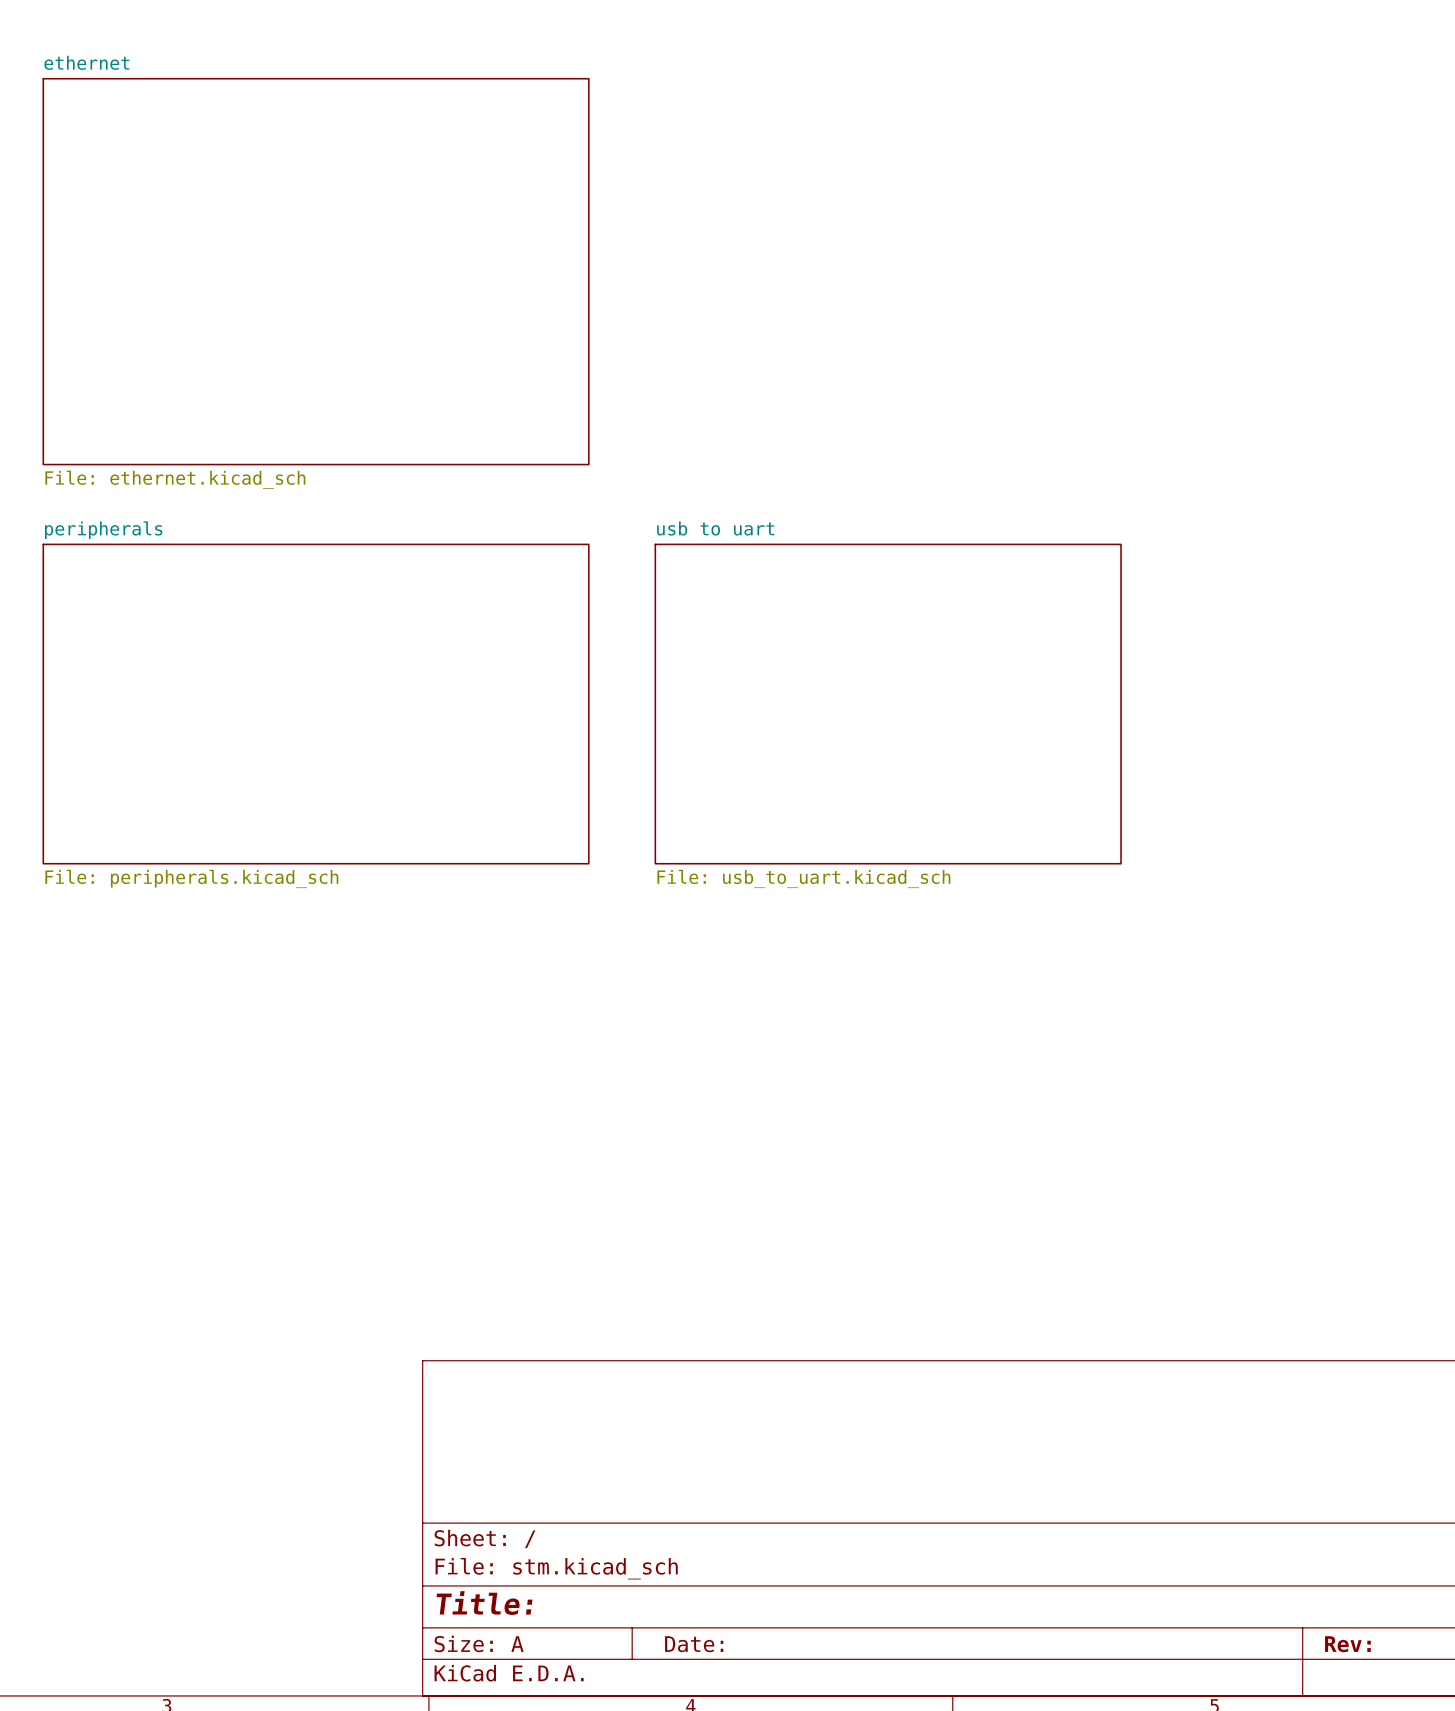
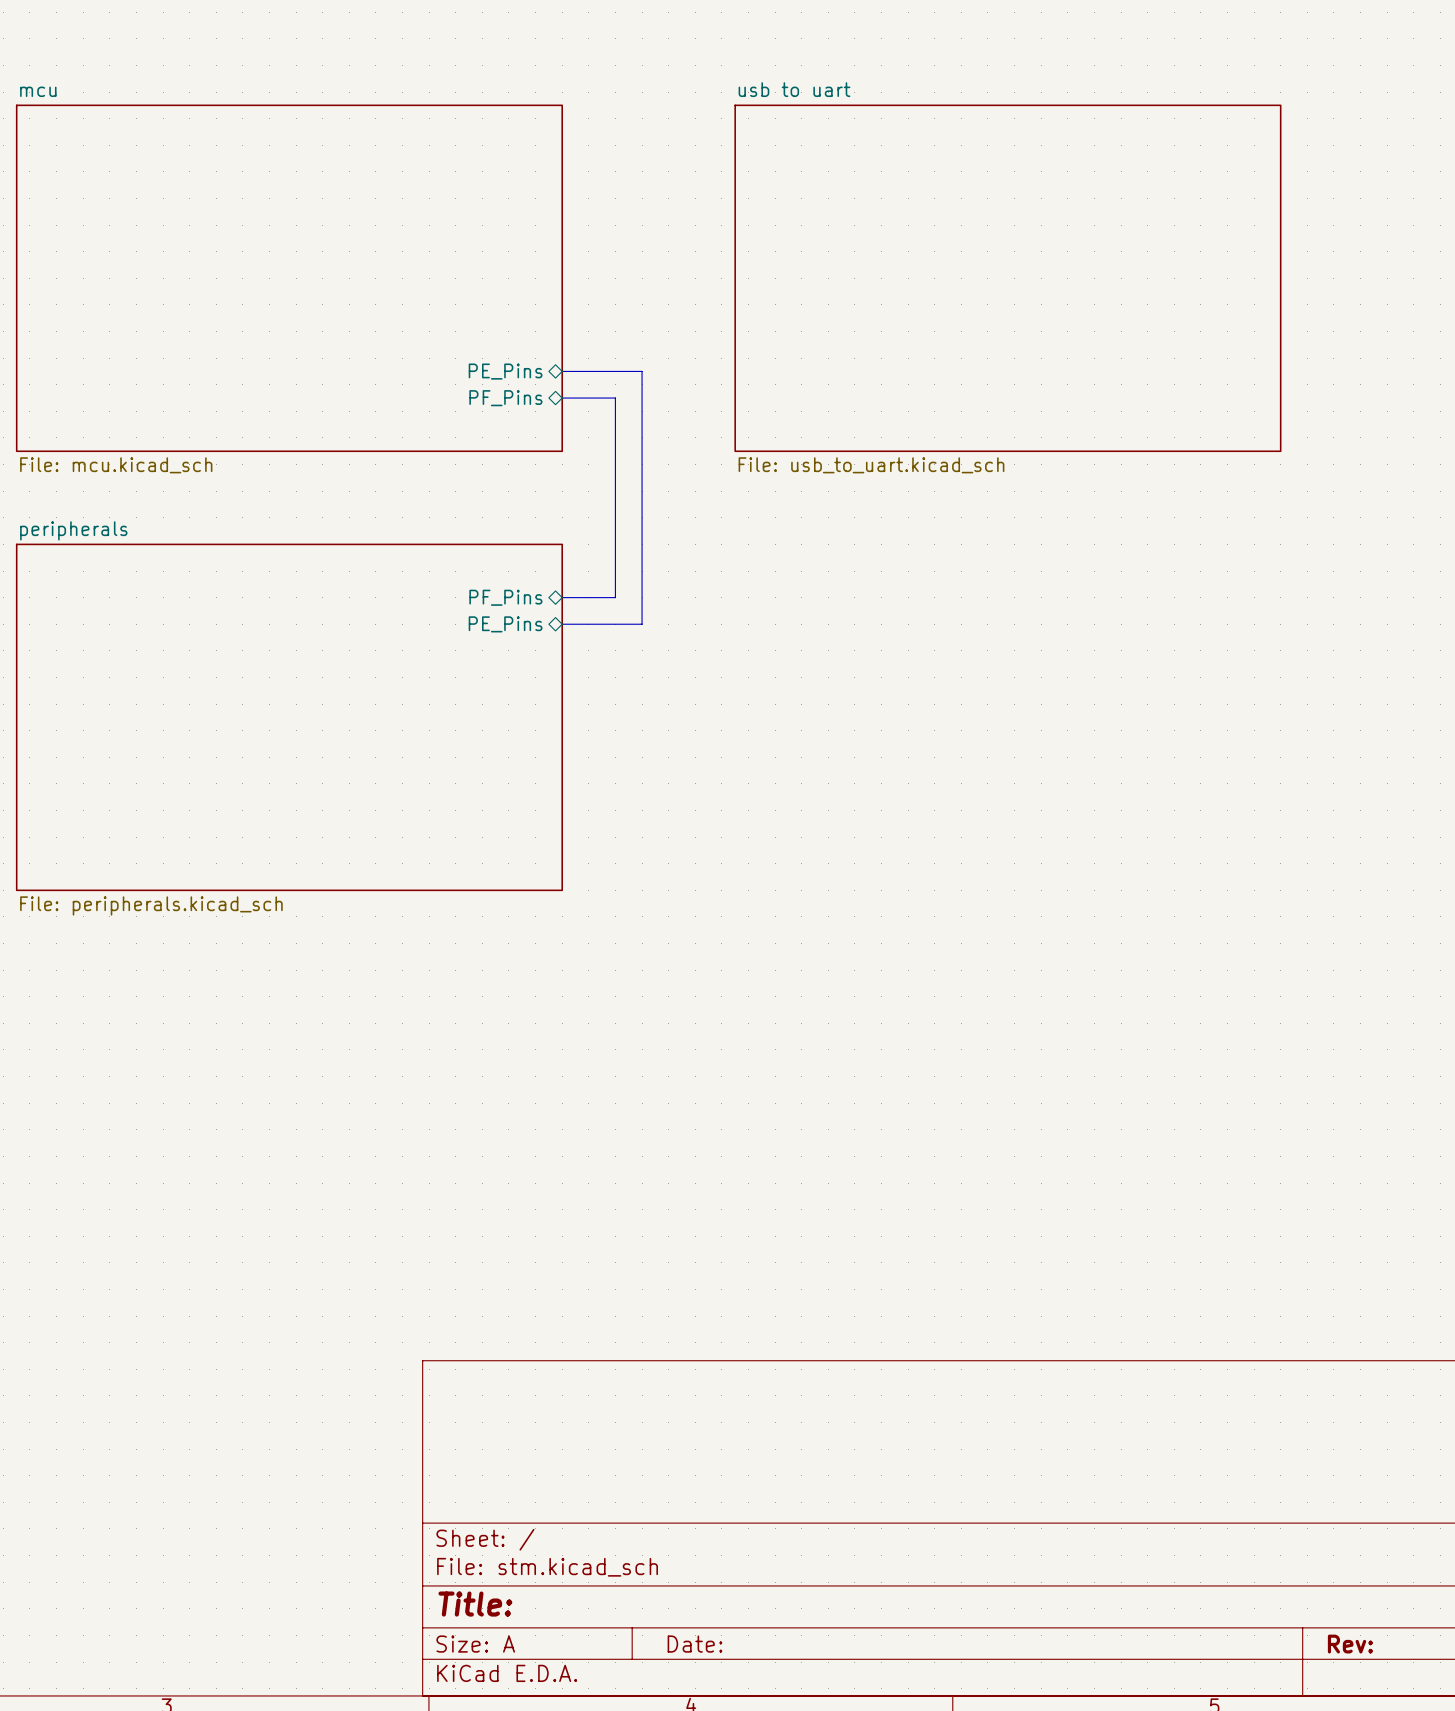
sheet ethernet: File: ethernet.kicad_sch (316, 271) -> none
sheet mcu: none -> File: mcu.kicad_sch (289, 278)
sheet usb to uart: none -> File: usb_to_uart.kicad_sch (1007, 278)
bus: none -> (562, 371) (642, 371) (642, 624) (562, 624)
sheet pin: none -> PE_Pins (505, 371)
bus: none -> (562, 398) (615, 398) (615, 597) (562, 597)
sheet pin: none -> PF_Pins (505, 398)
sheet pin: none -> PF_Pins (505, 597)
sheet pin: none -> PE_Pins (505, 624)
sheet peripherals: File: peripherals.kicad_sch (316, 704) -> none
sheet usb to uart: File: usb_to_uart.kicad_sch (888, 704) -> none
sheet peripherals: none -> File: peripherals.kicad_sch (289, 717)

